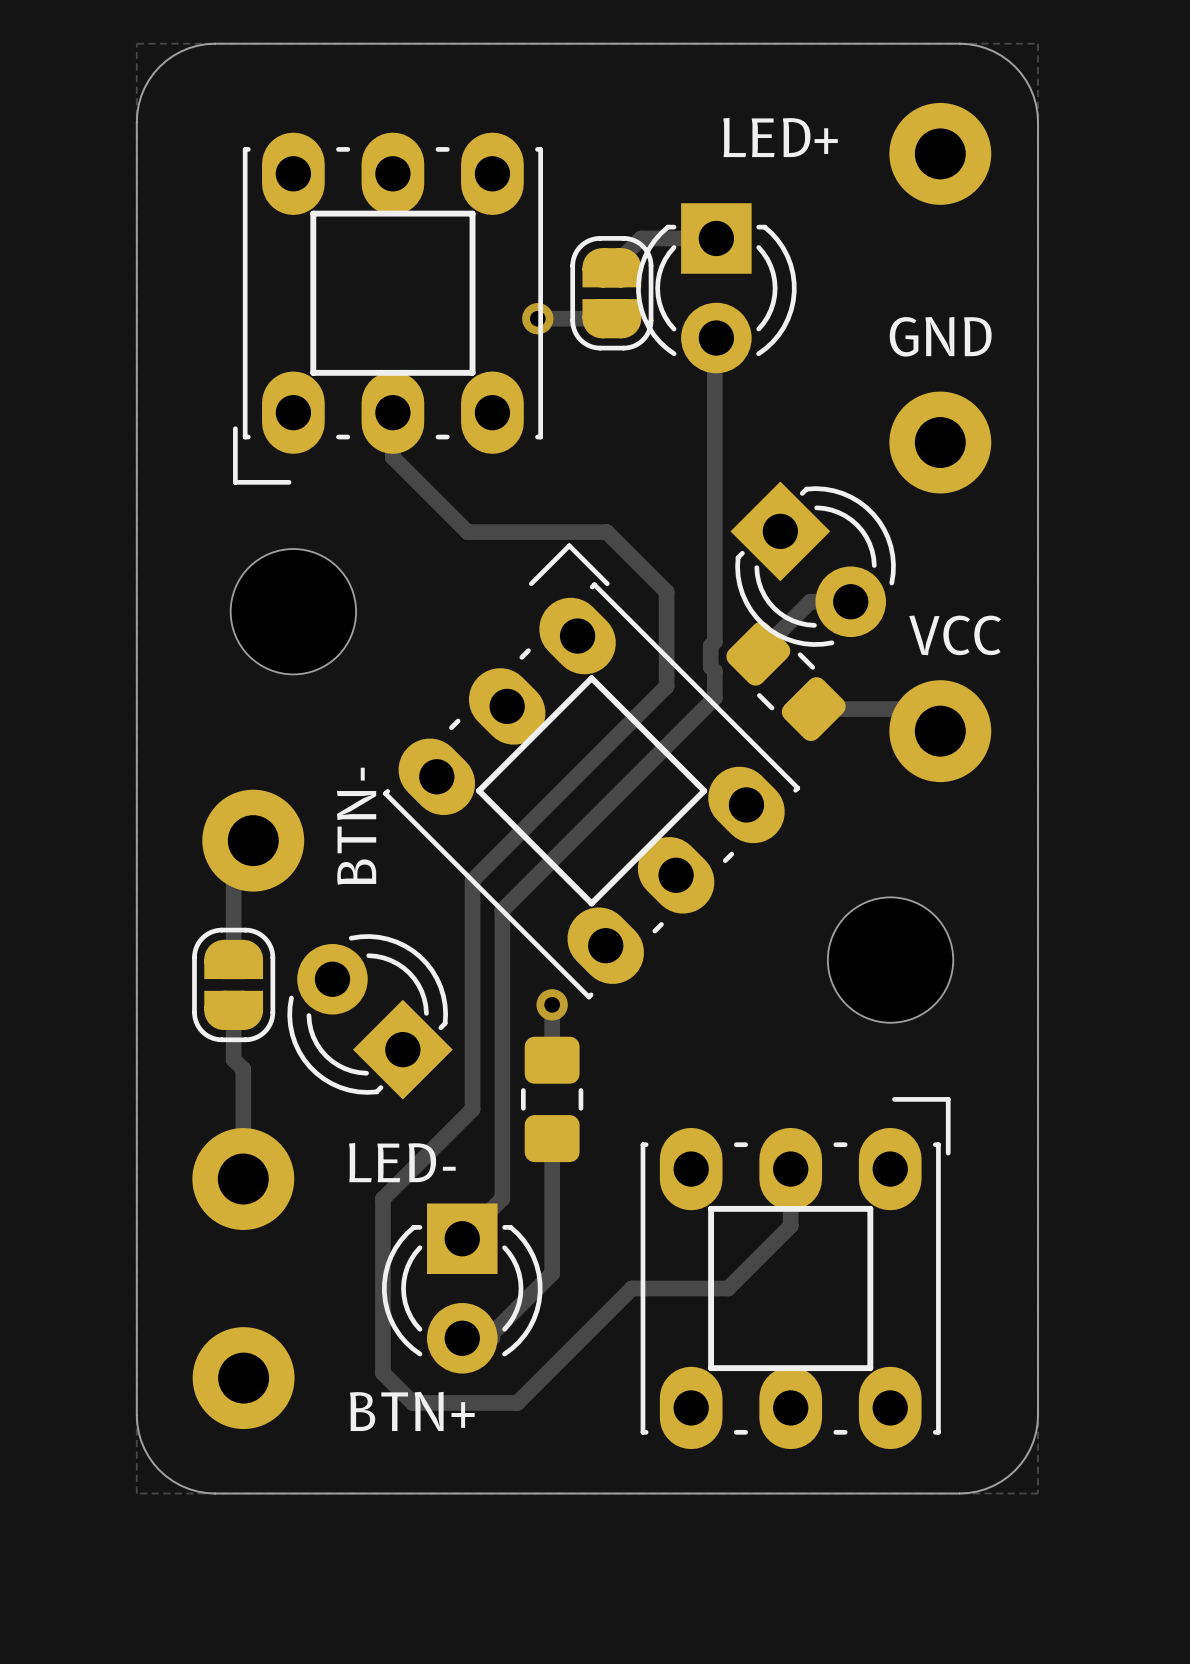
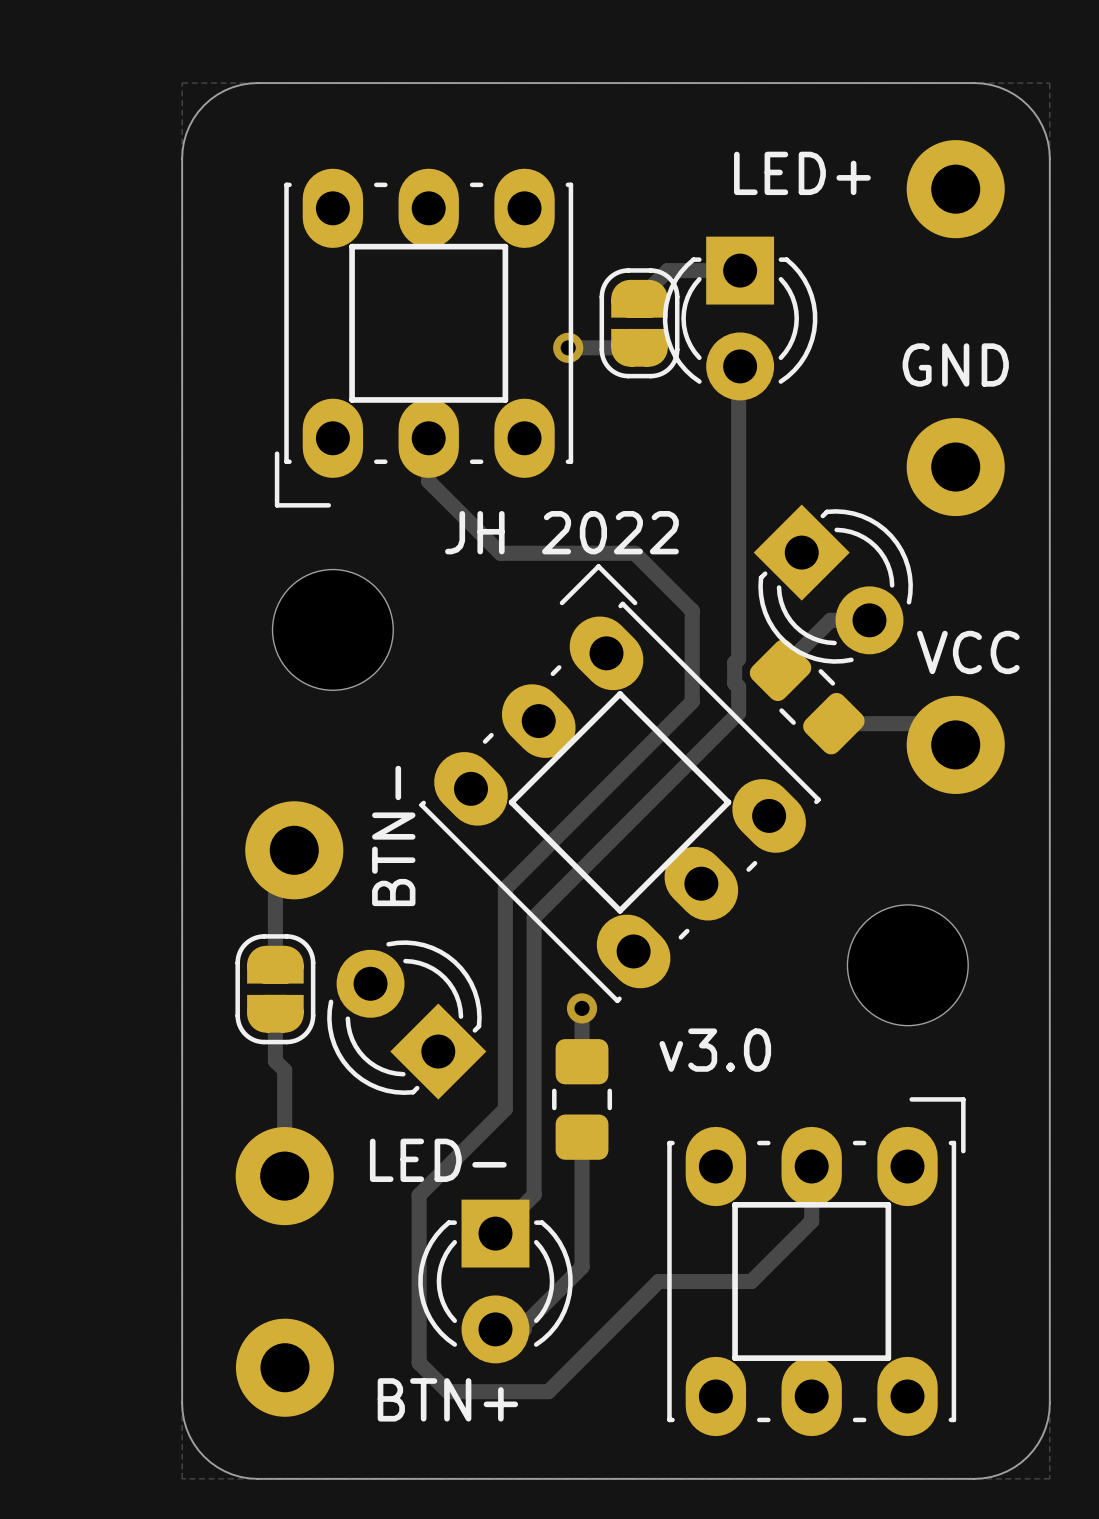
text: none -> JH 2022 (561, 532)
text: none -> v3.0 (715, 1050)

